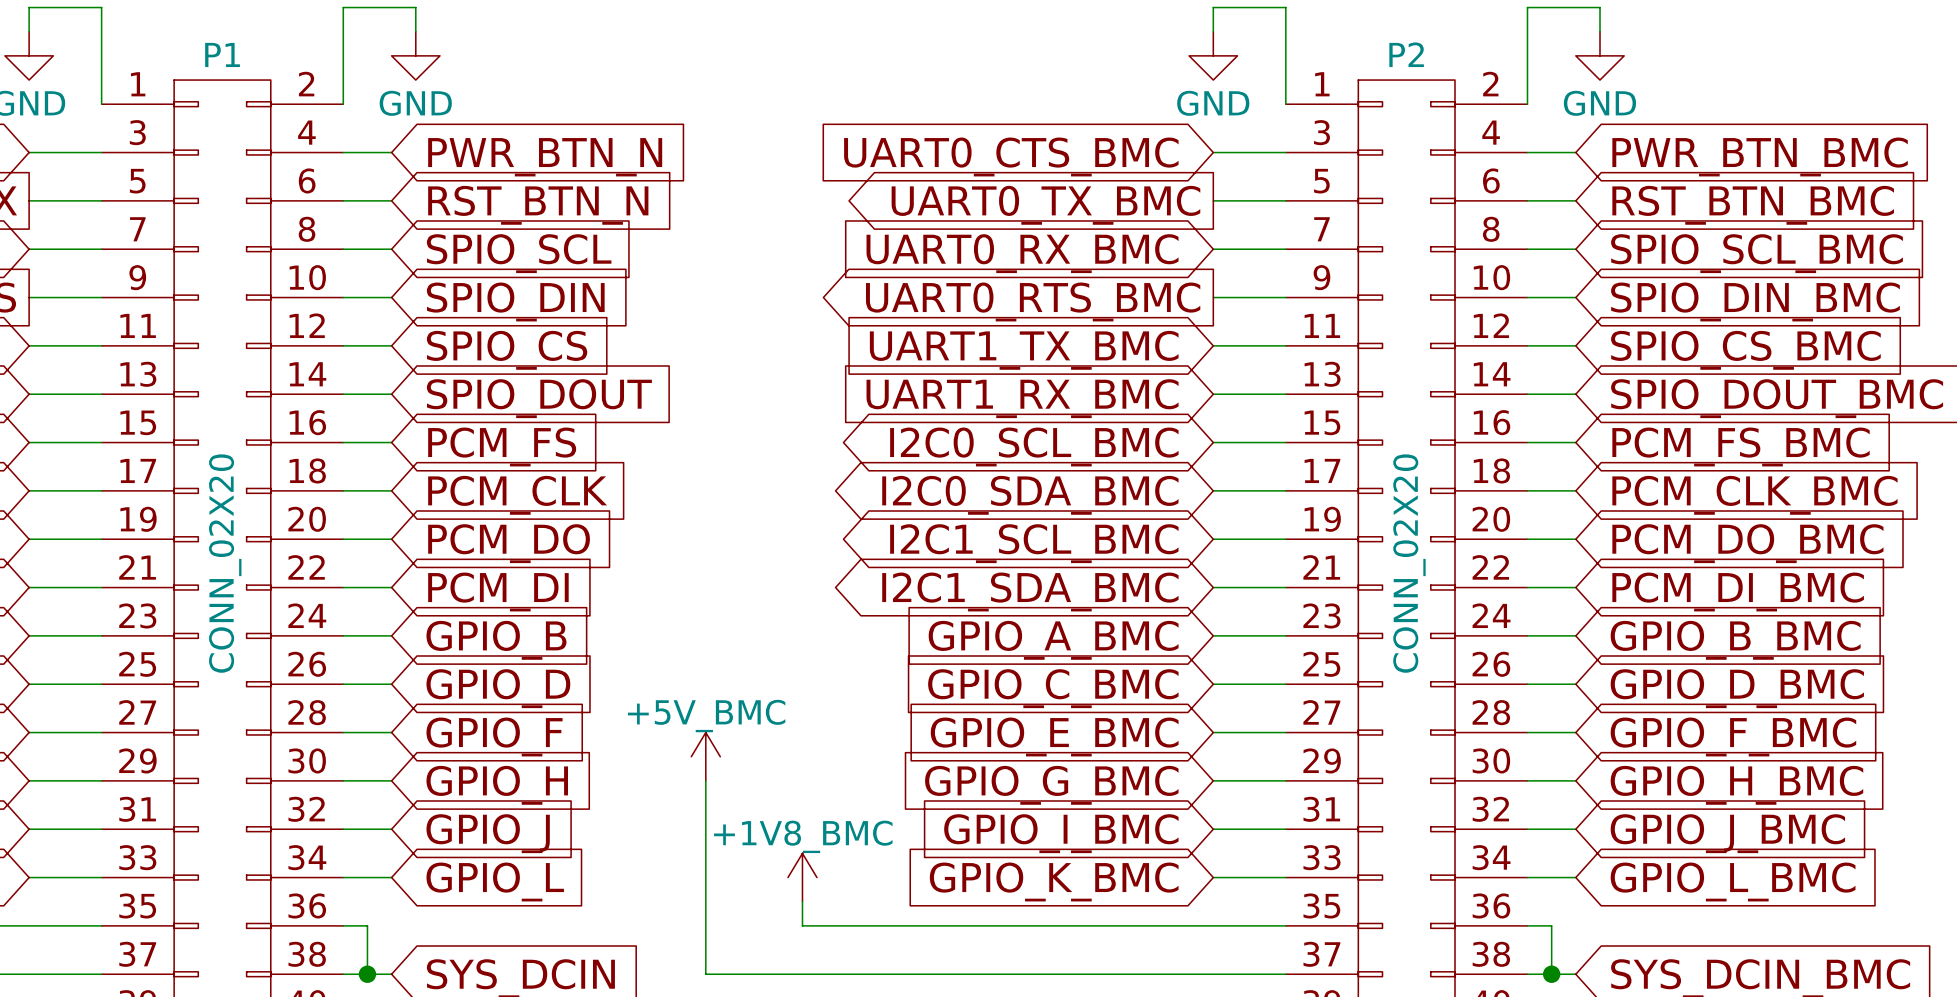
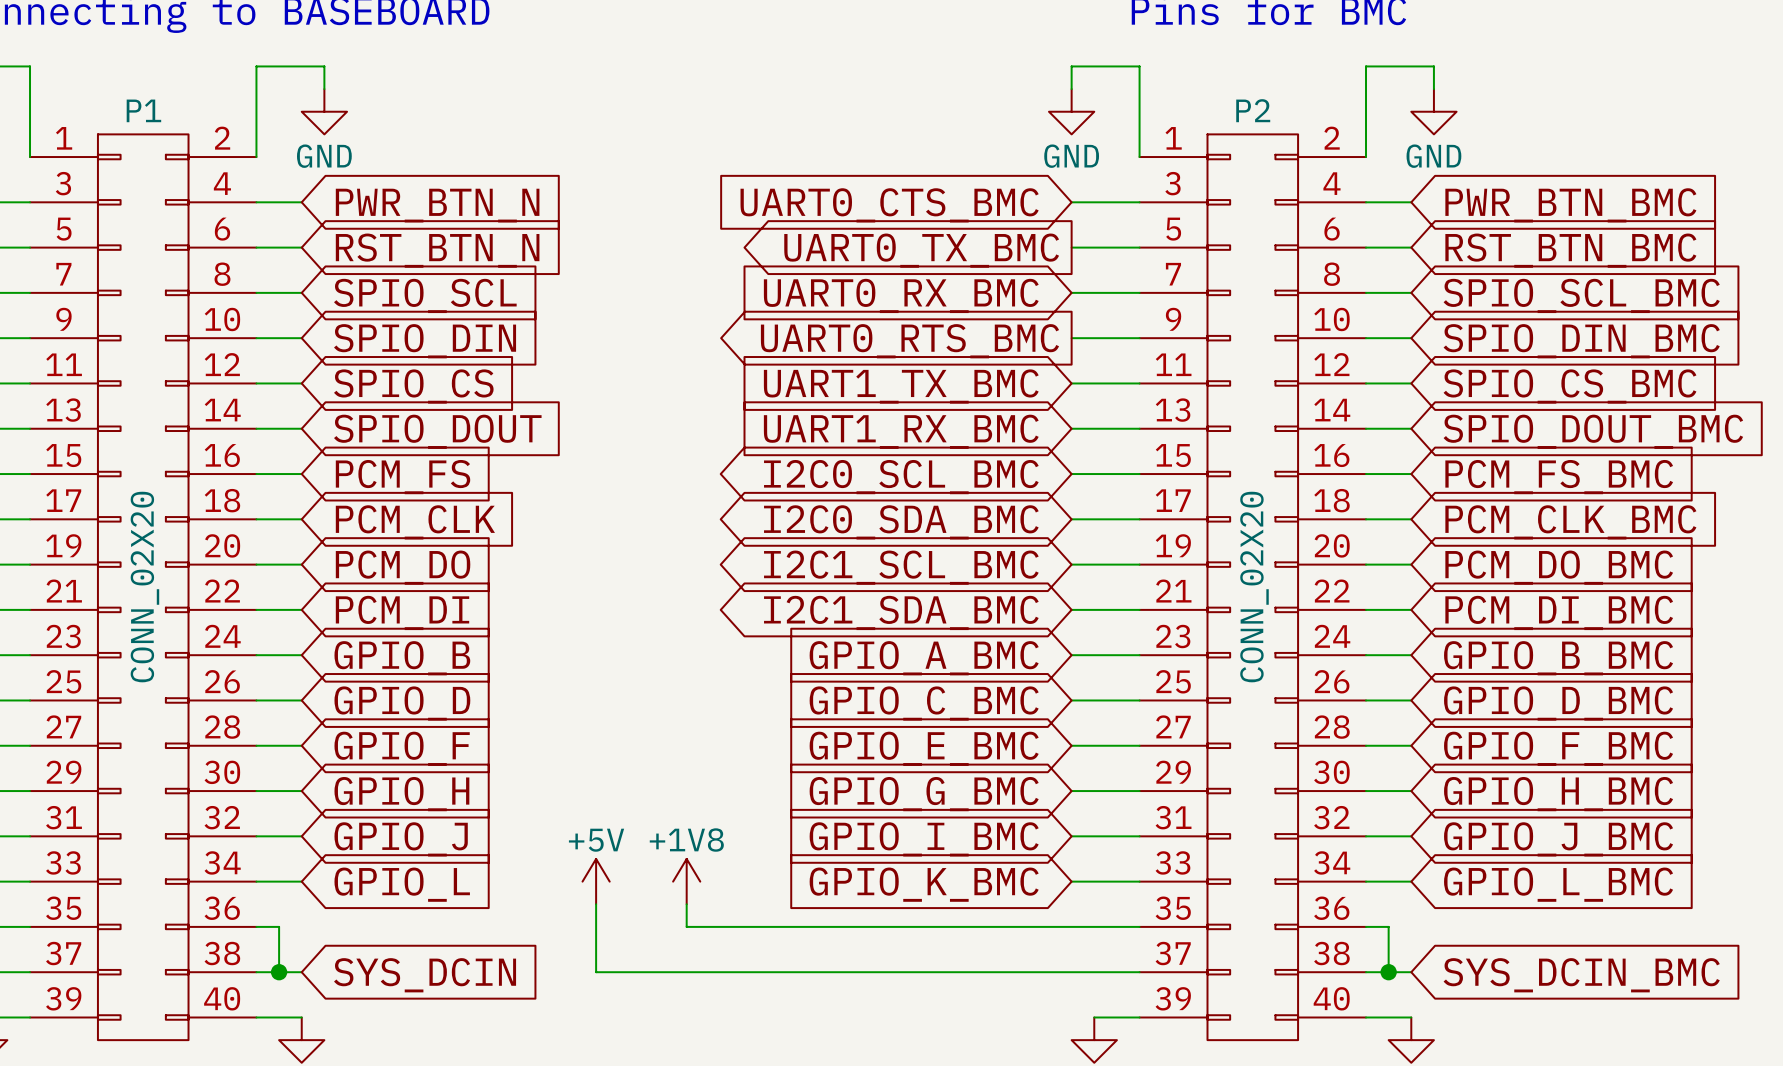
power symbol: +5V_BMC (705, 756) -> none
wire: (705, 780) (705, 901) -> none
power symbol: none -> +5V (596, 881)
power symbol: +1V8_BMC (802, 877) -> +1V8 (686, 881)

